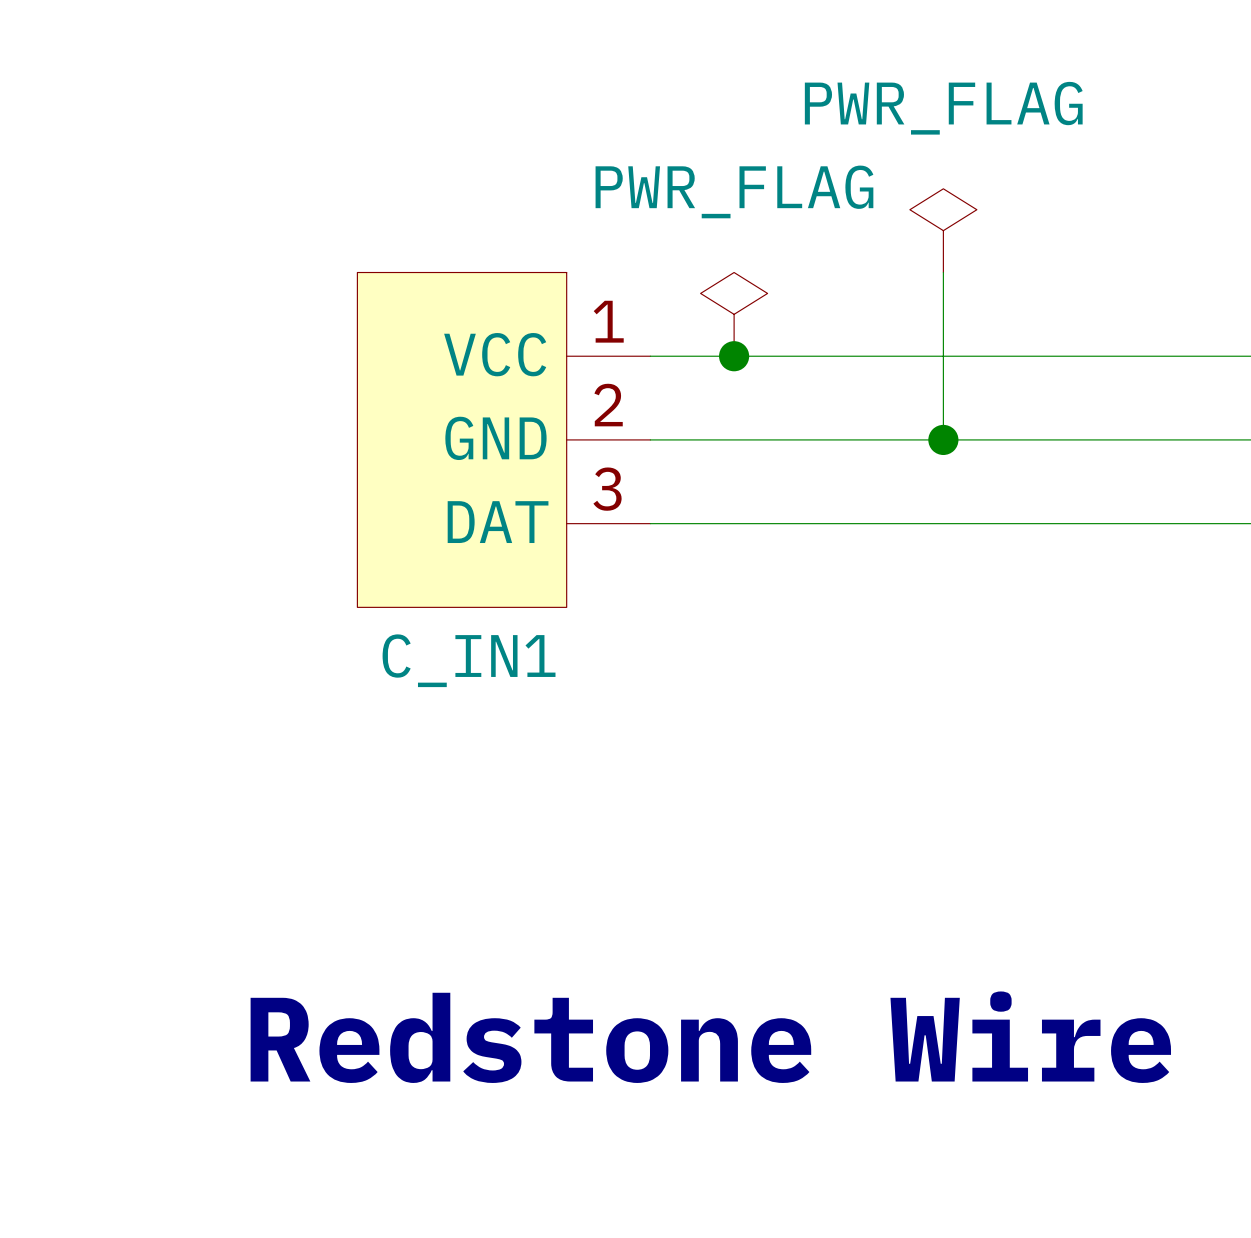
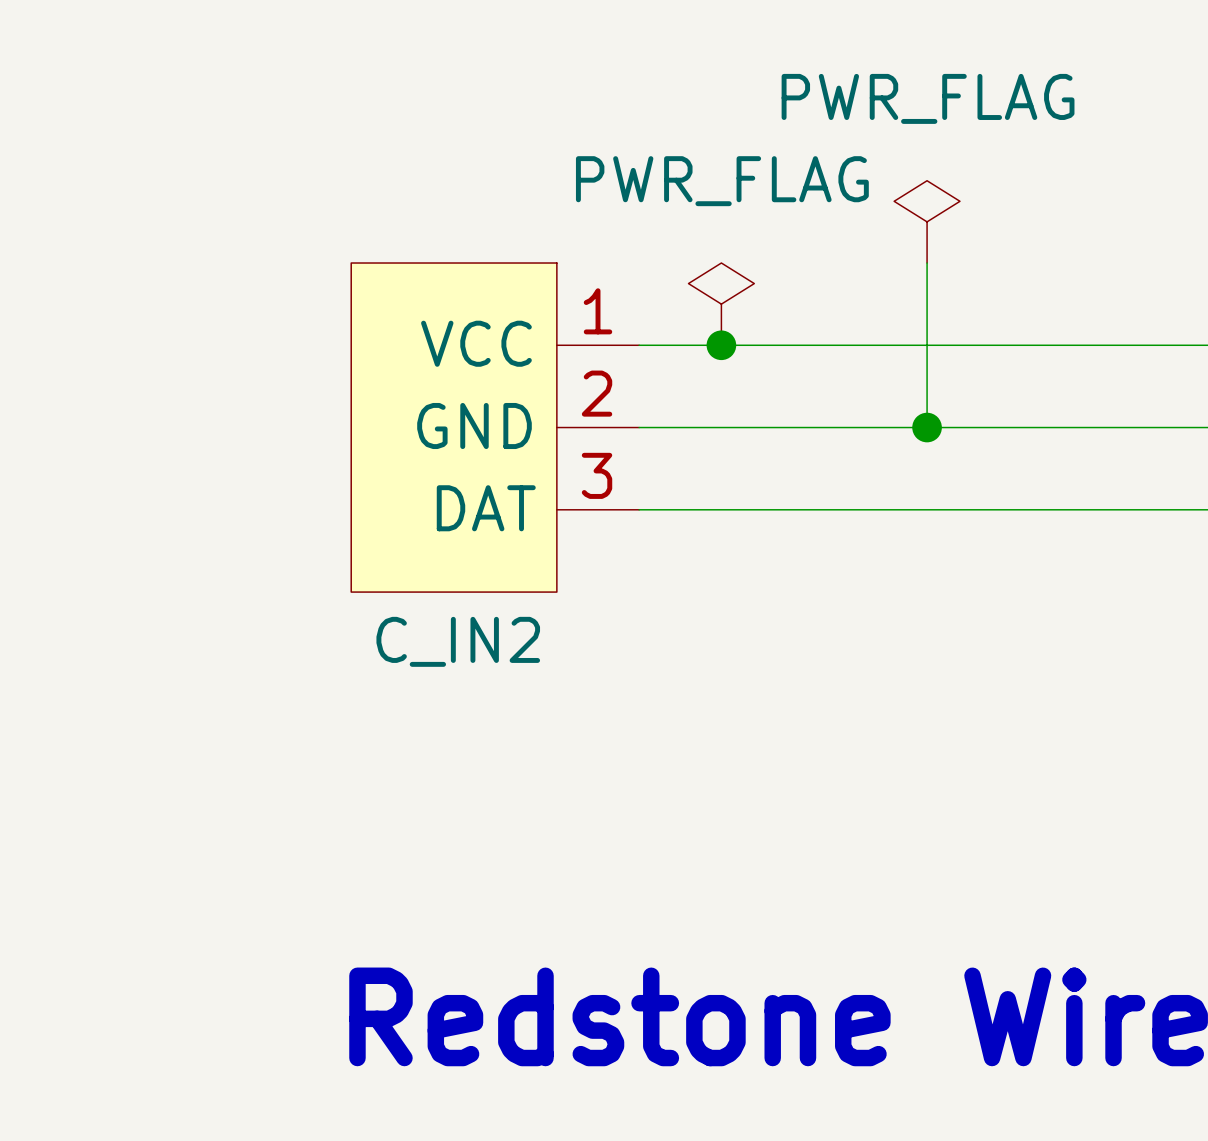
C_IN1 name: C_IN1 (469, 660) -> C_IN2 (458, 641)

